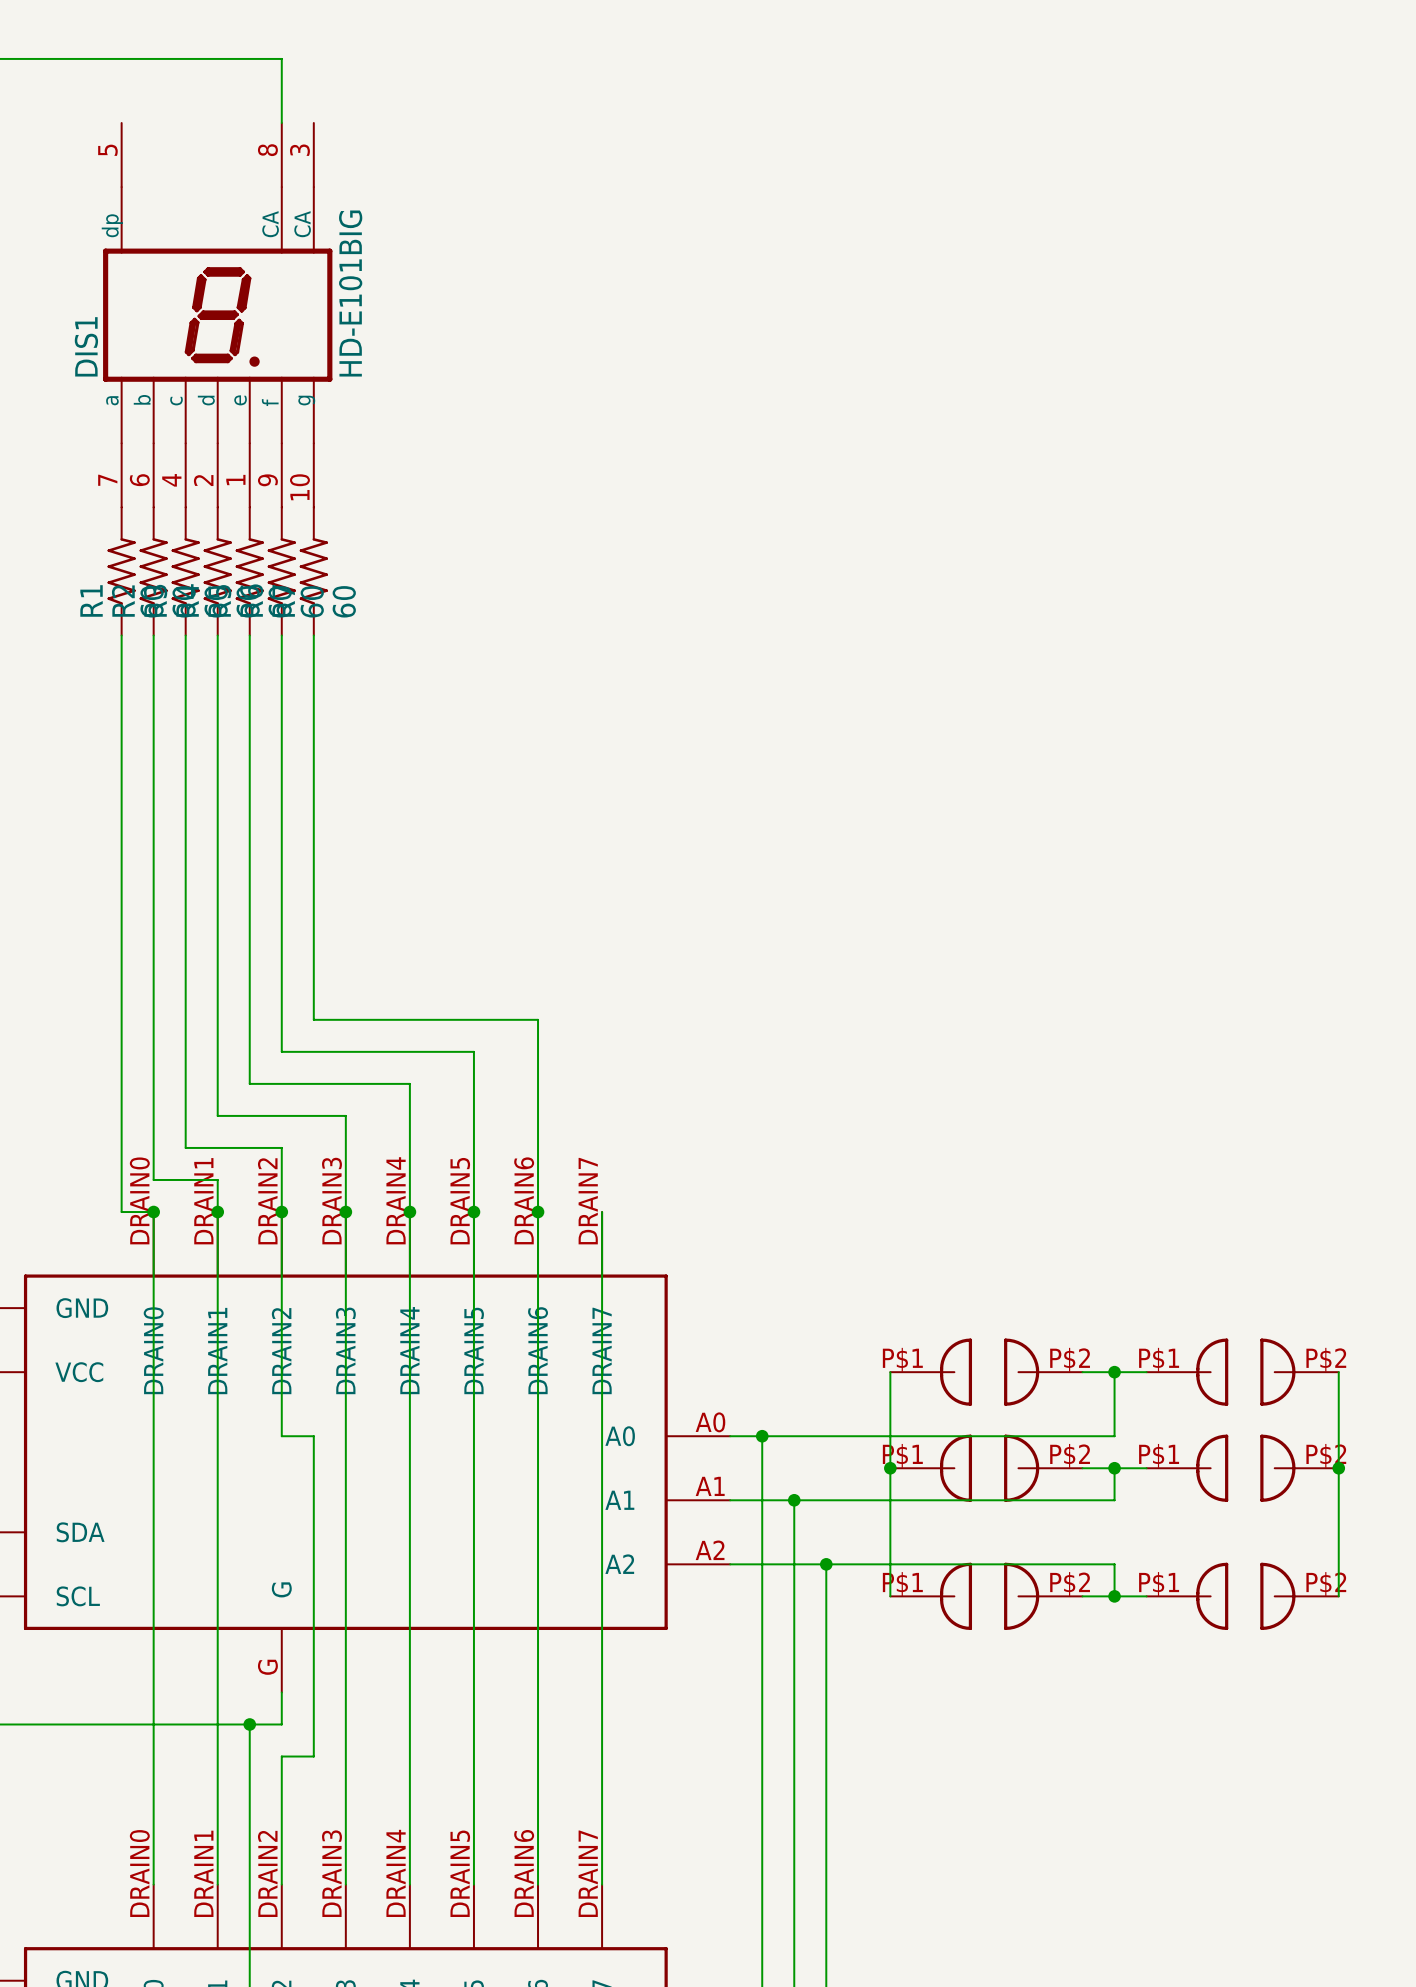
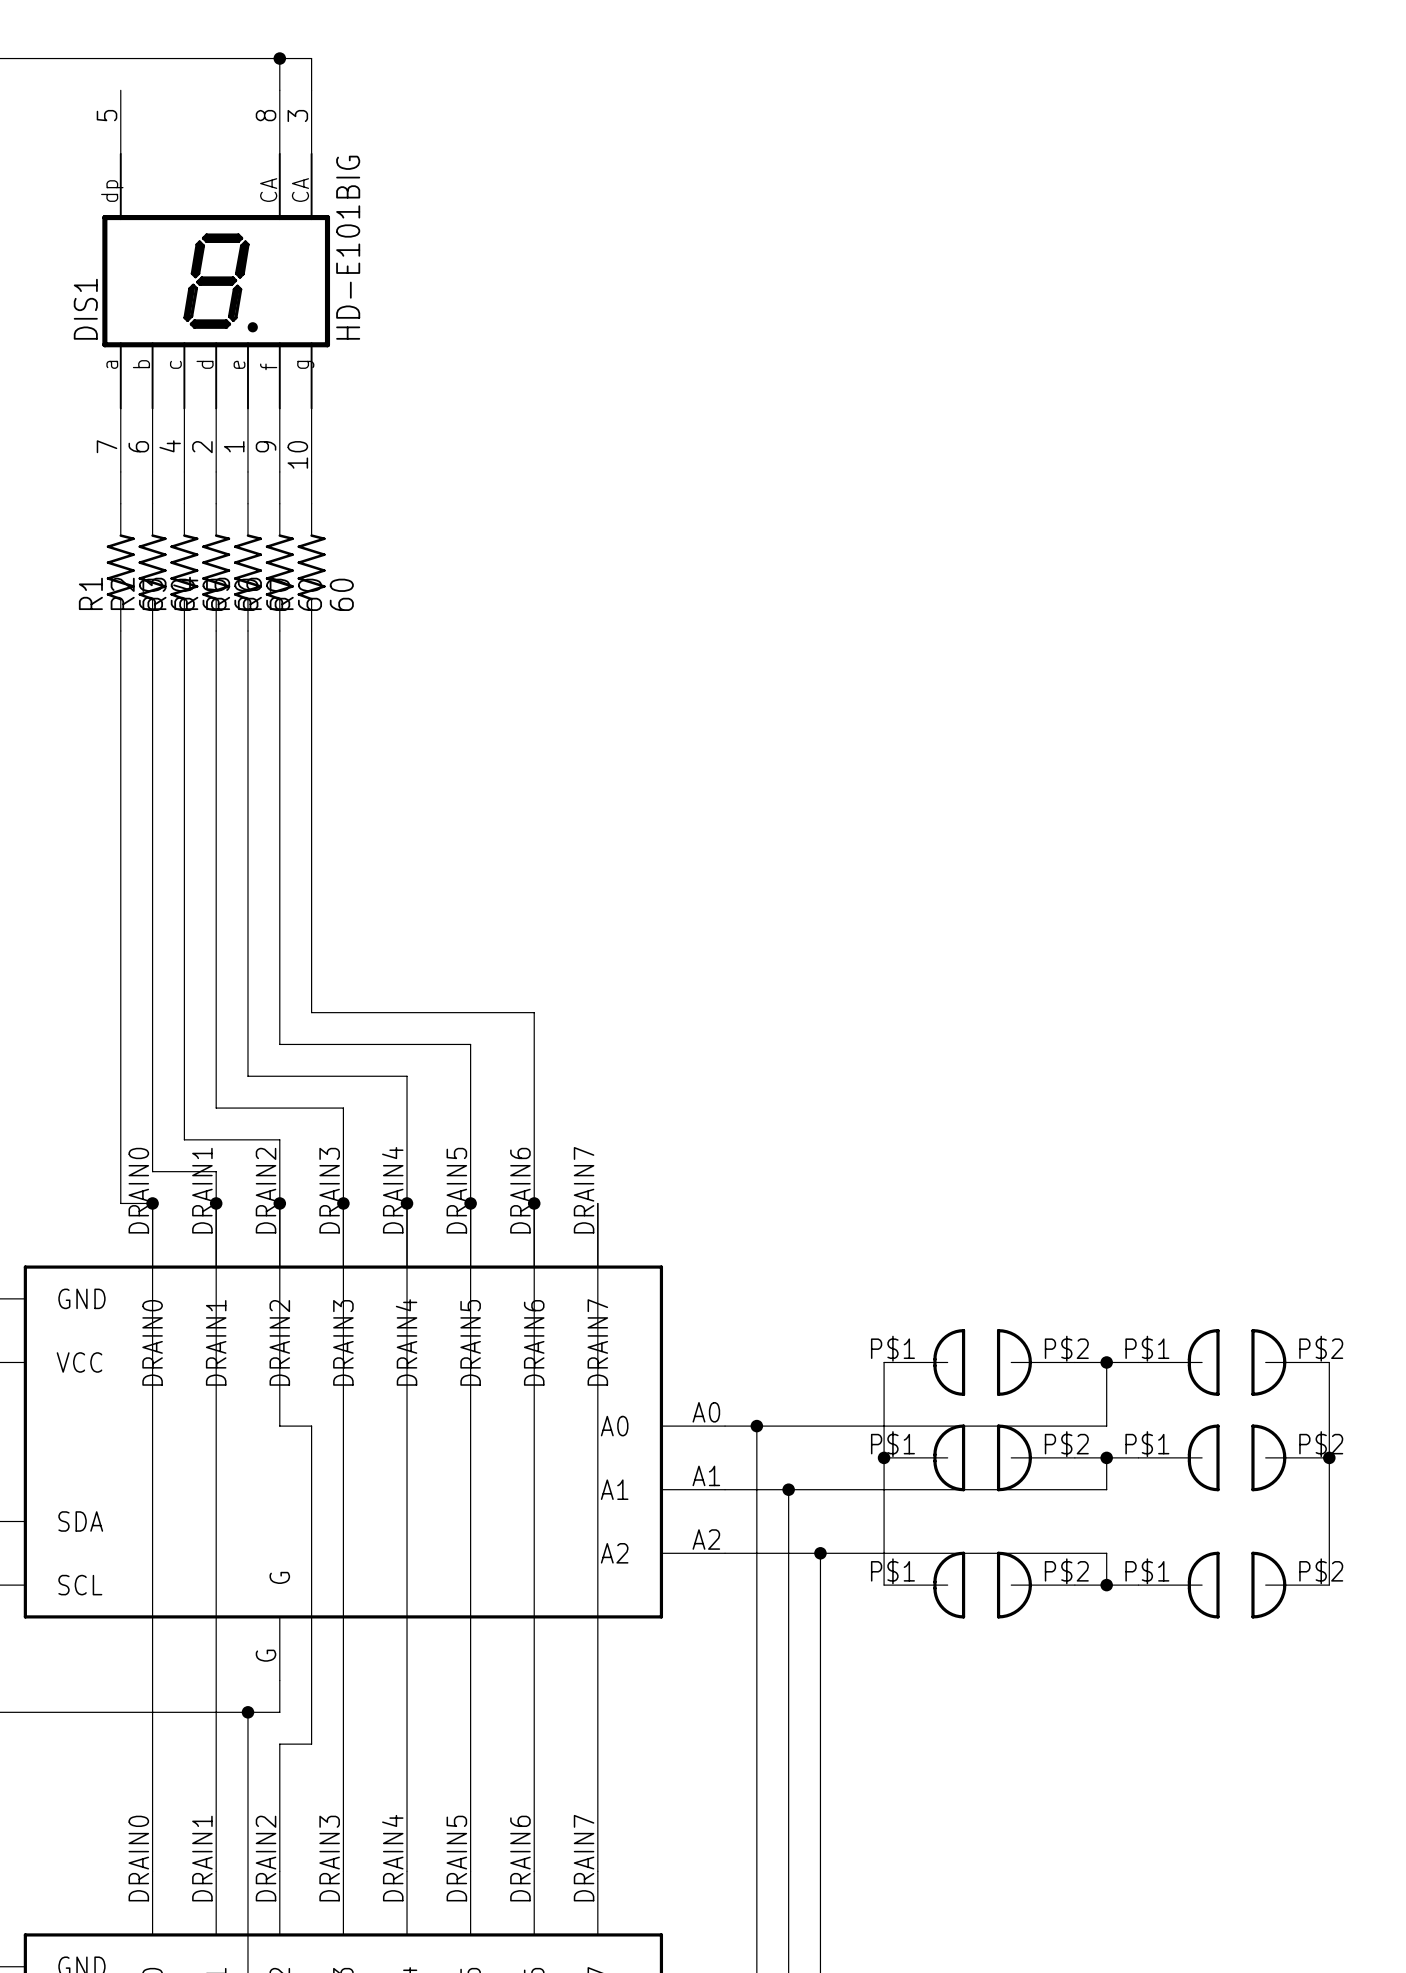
wire: none -> (279, 58) (311, 58) (311, 90)
junction: none -> (279, 58)
DIS1 position: (217, 315) -> (216, 281)

